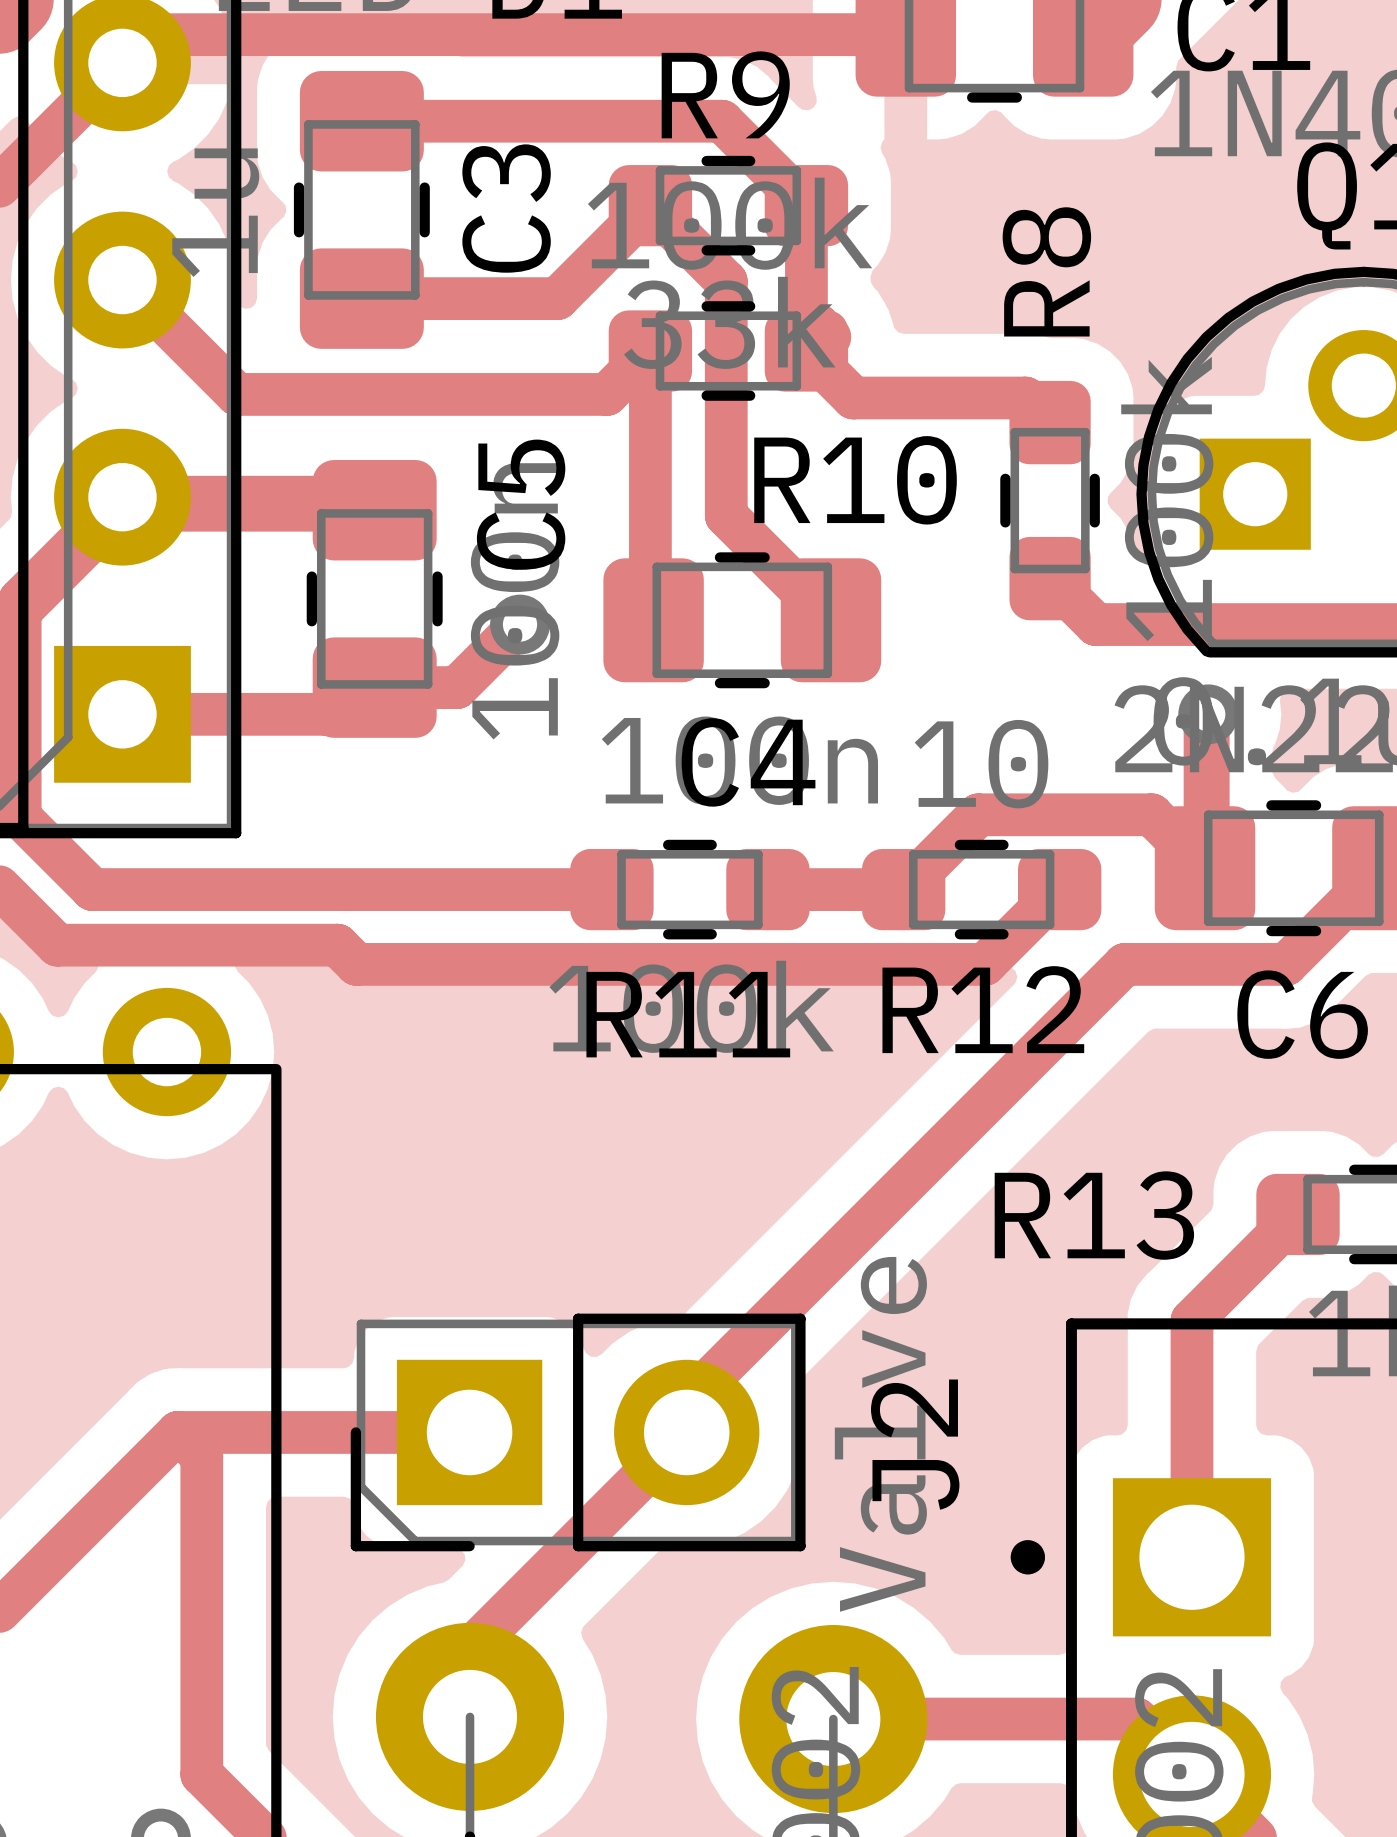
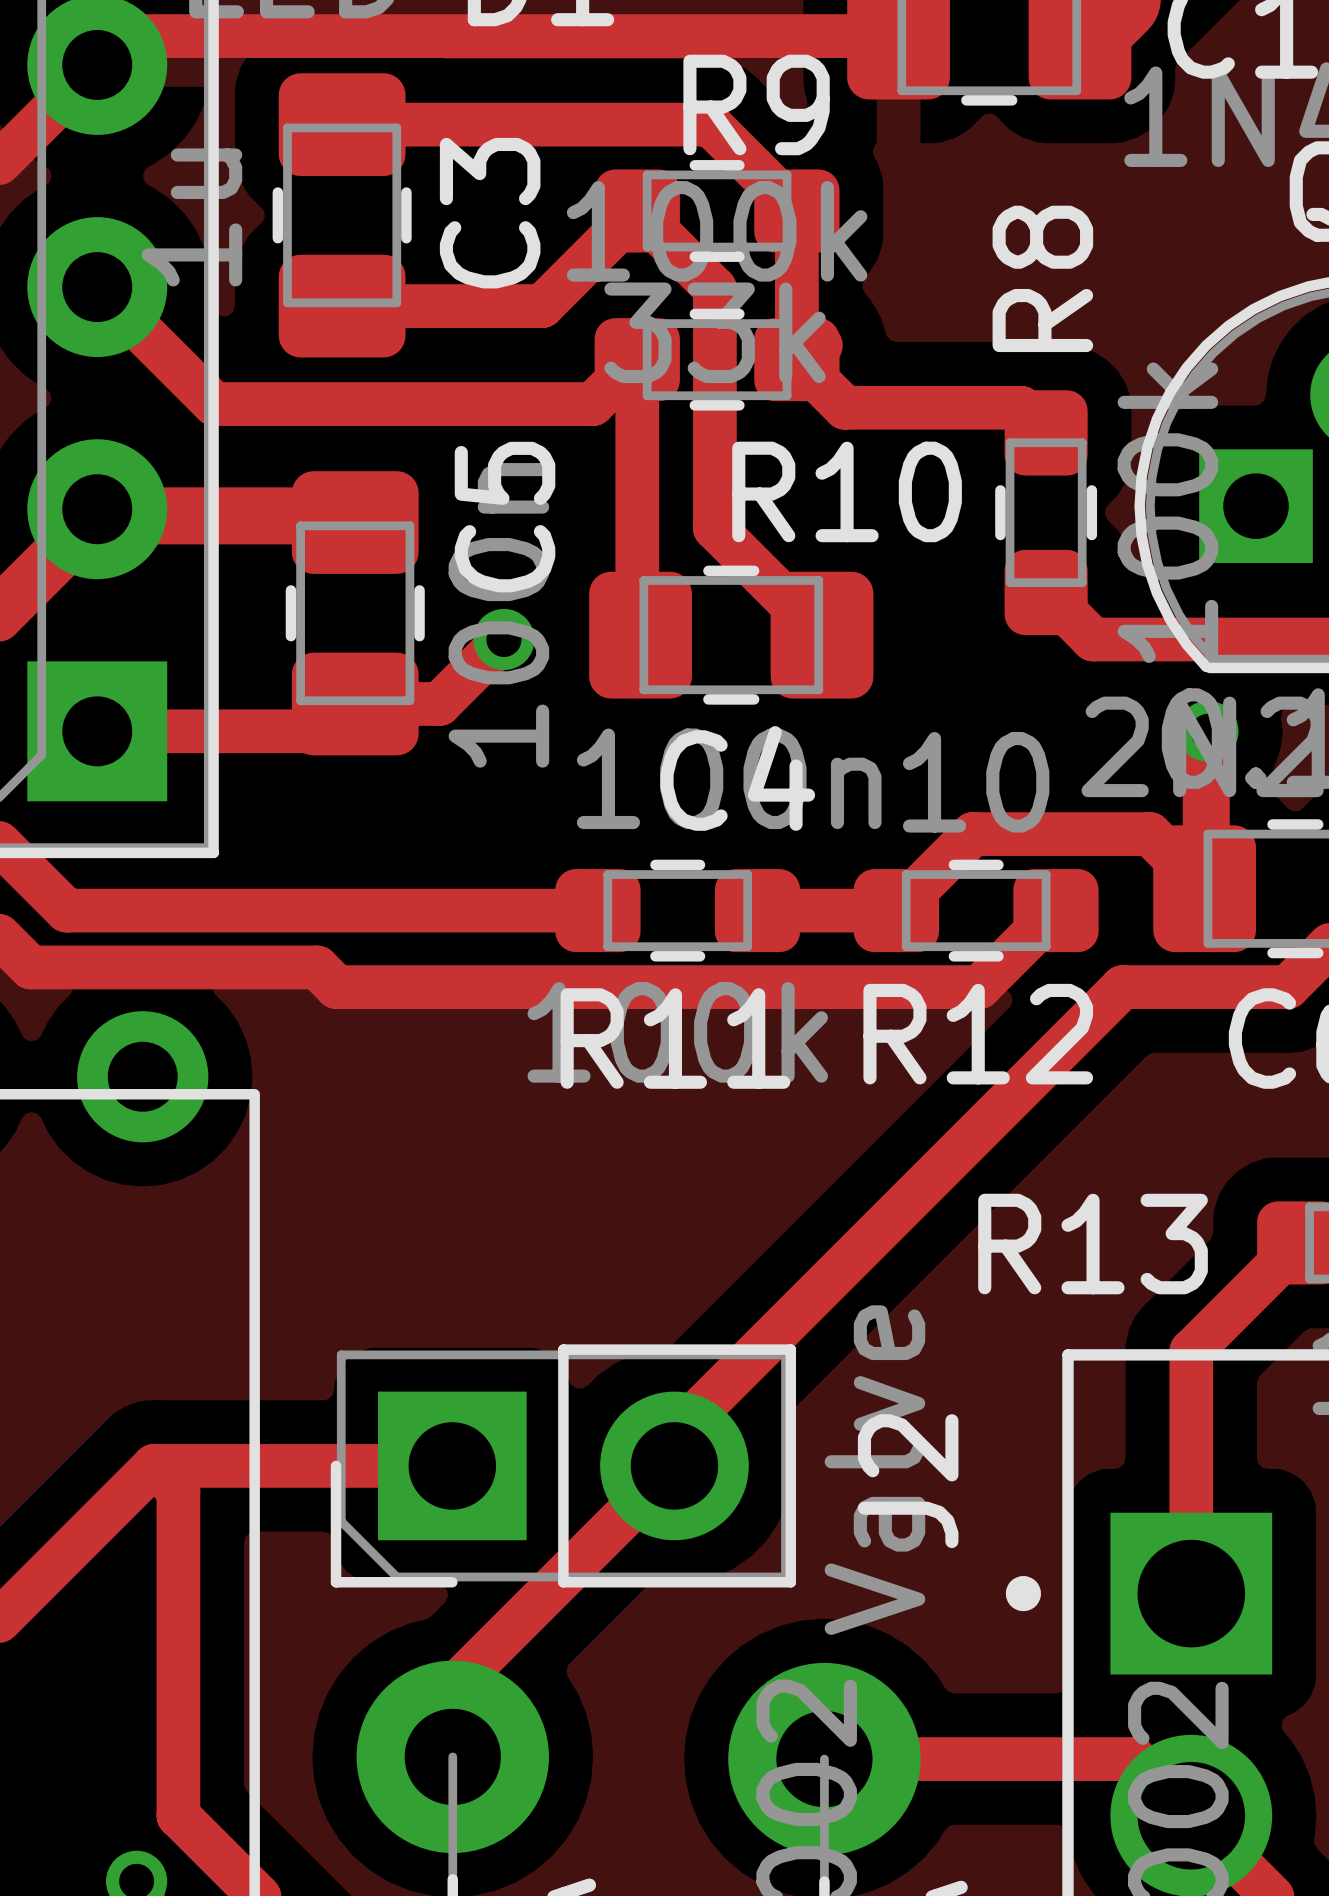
R9 name position: R9 (725, 94) -> R9 (756, 104)

